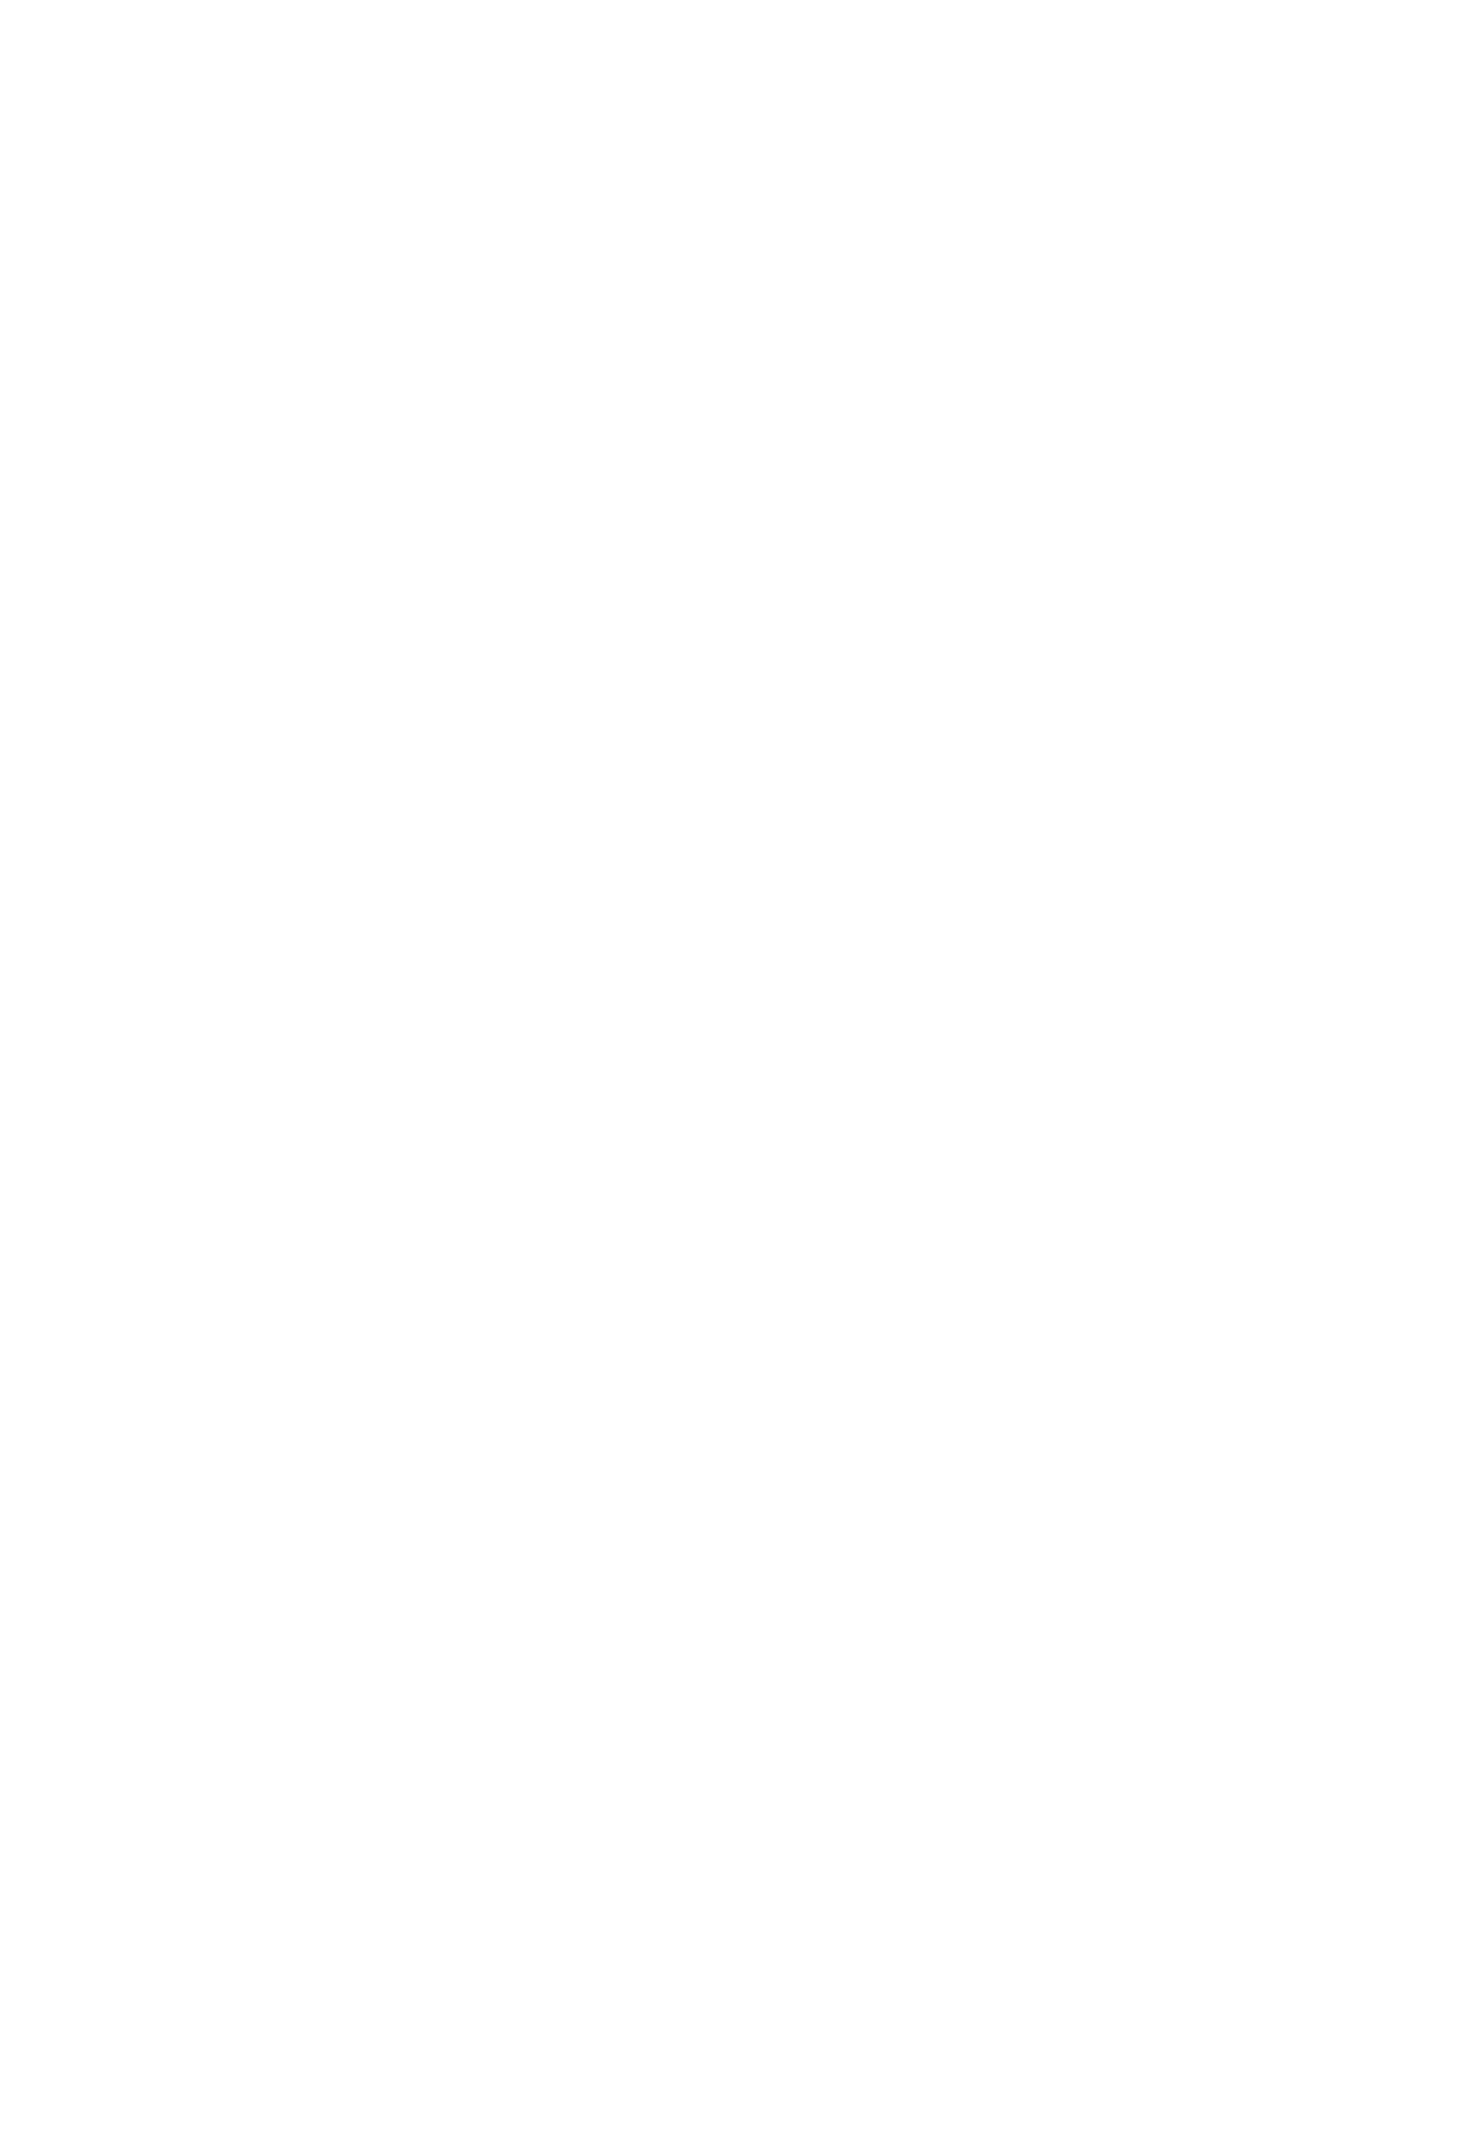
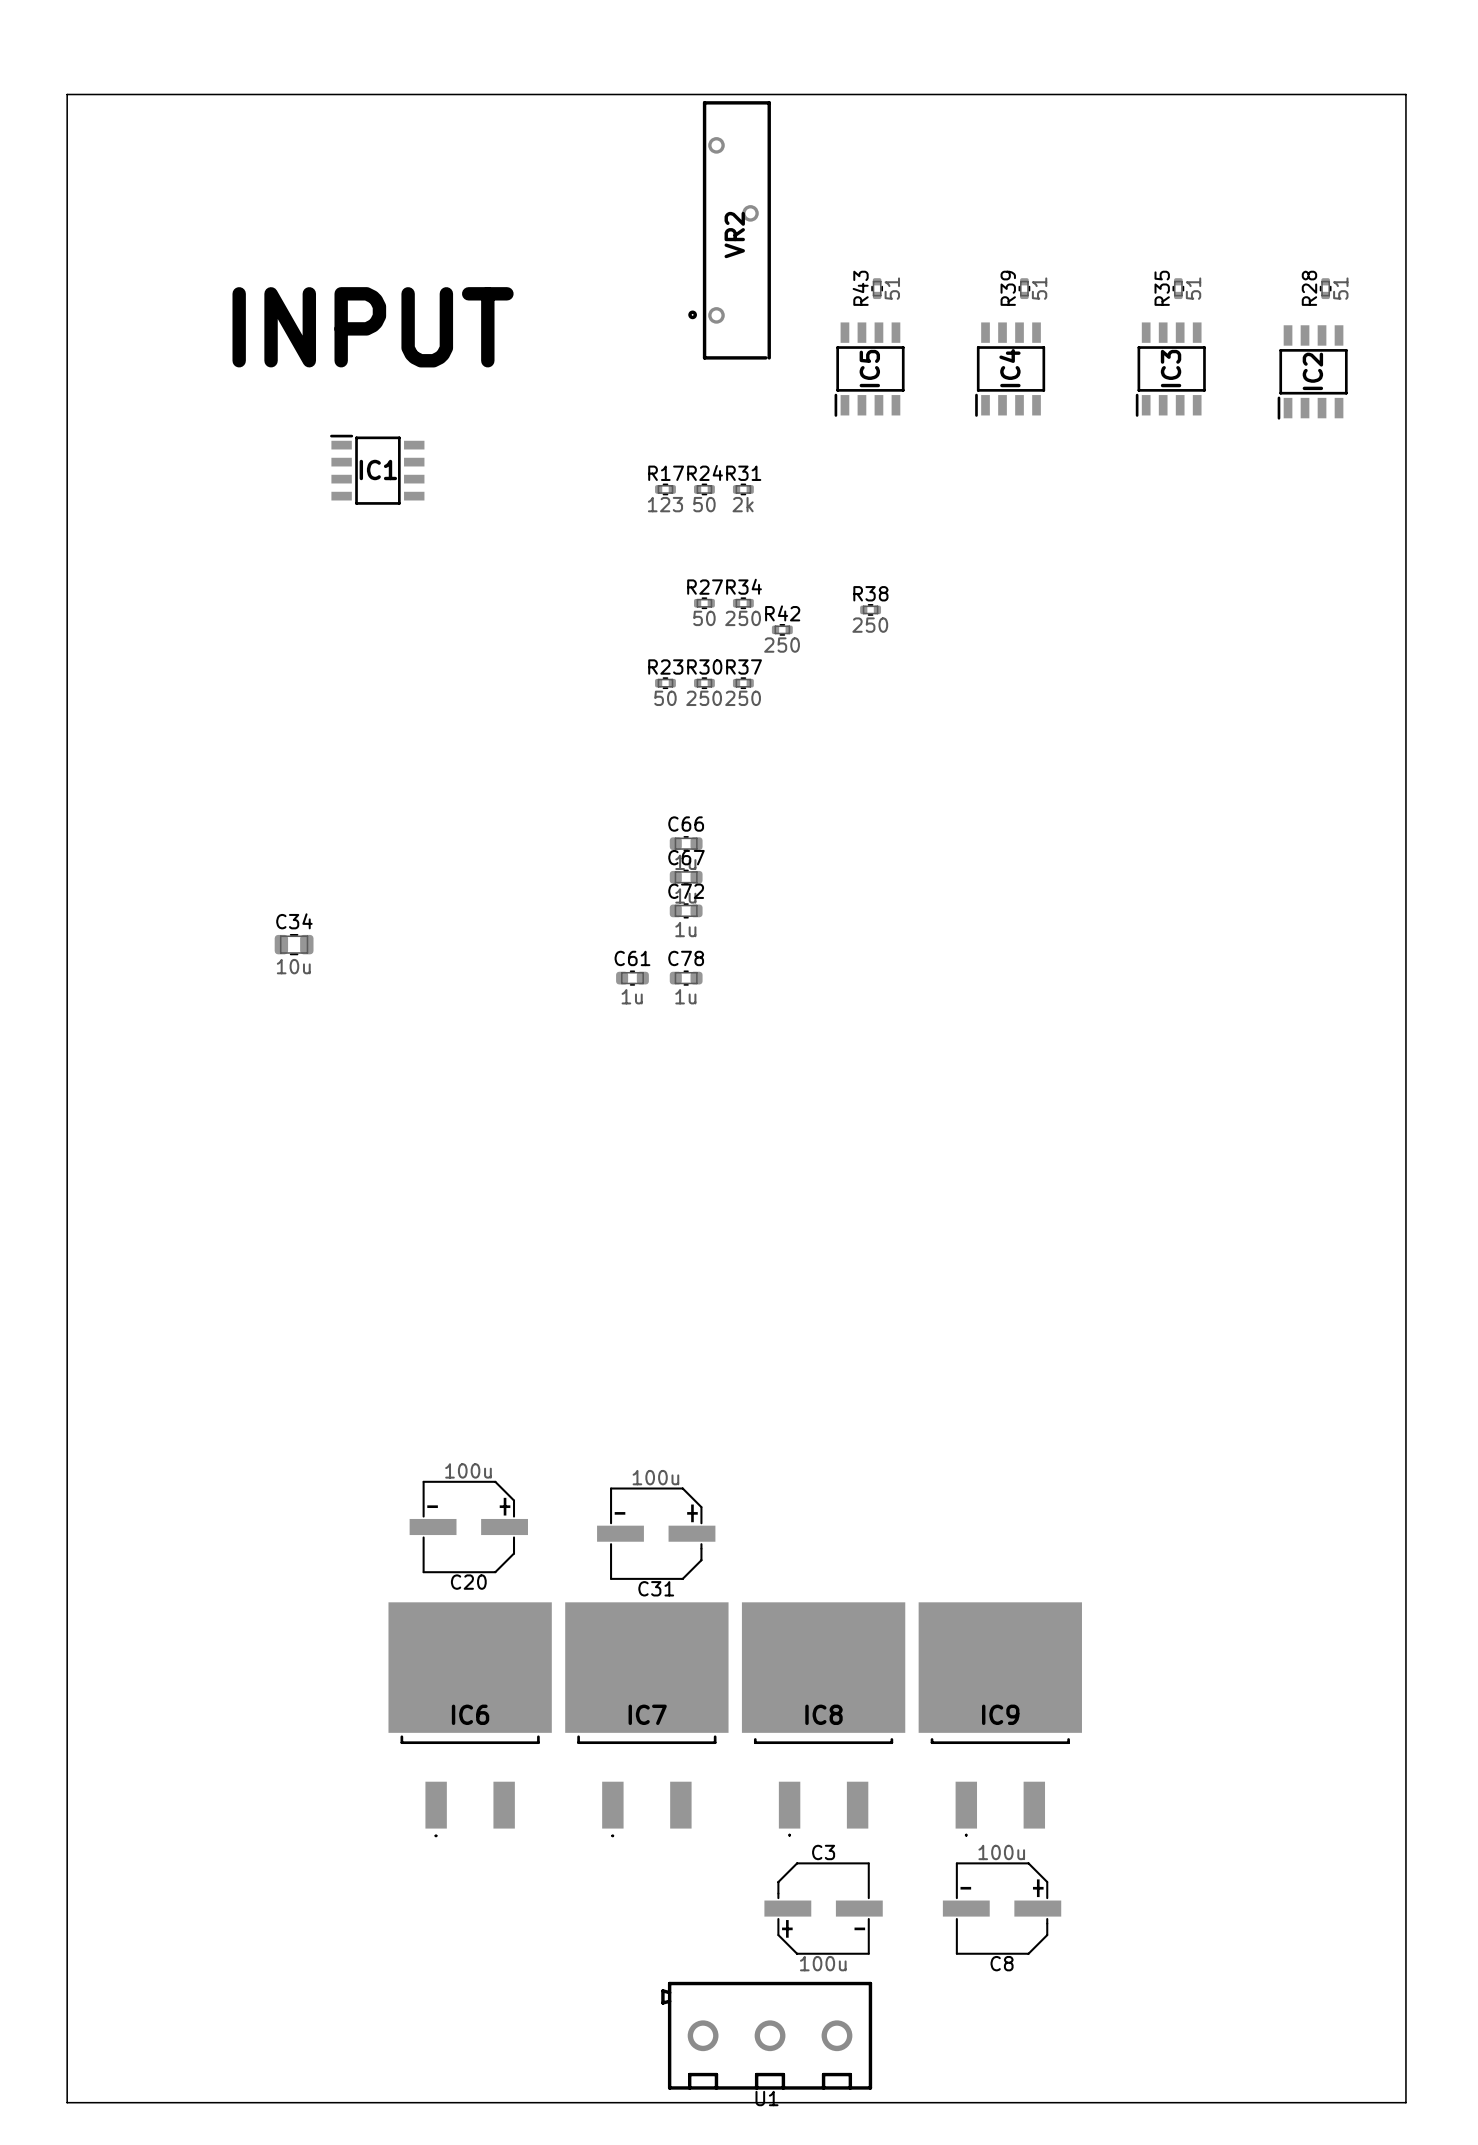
board edge: none -> (67, 94) (1405, 94) (1405, 2102) (67, 2102) (67, 94)
VR2: none -> (729, 230)
R43: none -> 51 (877, 288)
R39: none -> 51 (1024, 288)
R35: none -> 51 (1178, 288)
R28: none -> 51 (1325, 288)
text: none -> INPUT (373, 327)
IC5: none -> (869, 369)
IC4: none -> (1010, 369)
IC3: none -> (1170, 369)
IC2: none -> (1312, 372)
IC1: none -> (377, 469)
R17: none -> 123 (665, 489)
R24: none -> 50 (704, 489)
R31: none -> 2k (743, 489)
R27: none -> 50 (704, 603)
R34: none -> 250 (743, 603)
R38: none -> 250 (870, 609)
R42: none -> 250 (782, 629)
R23: none -> 50 (665, 683)
R30: none -> 250 (704, 683)
R37: none -> 250 (743, 683)
C66: none -> 1u (686, 843)
C67: none -> 1u (686, 877)
C72: none -> 1u (686, 910)
C34: none -> 10u (294, 944)
C61: none -> 1u (632, 978)
C78: none -> 1u (686, 978)
C20: none -> 100u (468, 1527)
C31: none -> 100u (656, 1533)
IC6: none -> (470, 1719)
IC7: none -> (646, 1719)
IC8: none -> (823, 1719)
IC9: none -> (1000, 1719)
C3: none -> 100u (823, 1908)
C8: none -> 100u (1002, 1908)
U1: none -> (766, 2035)

